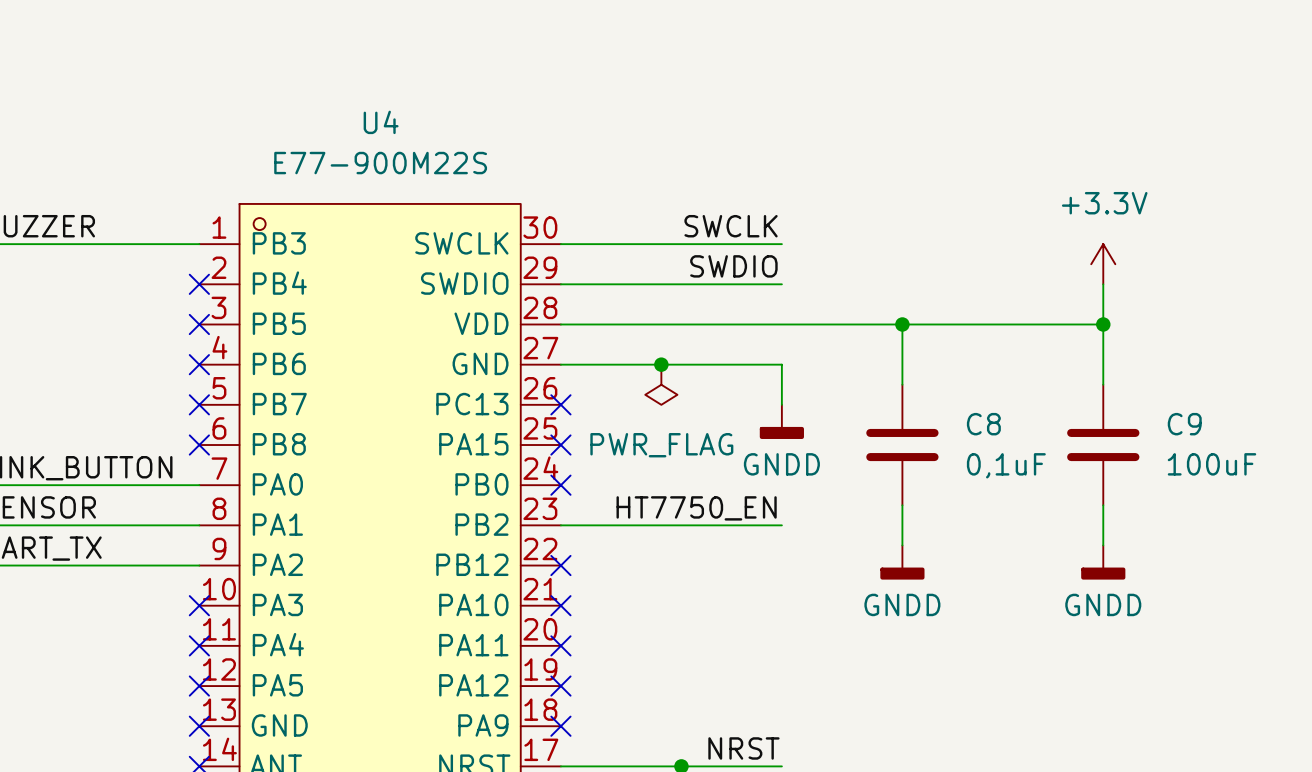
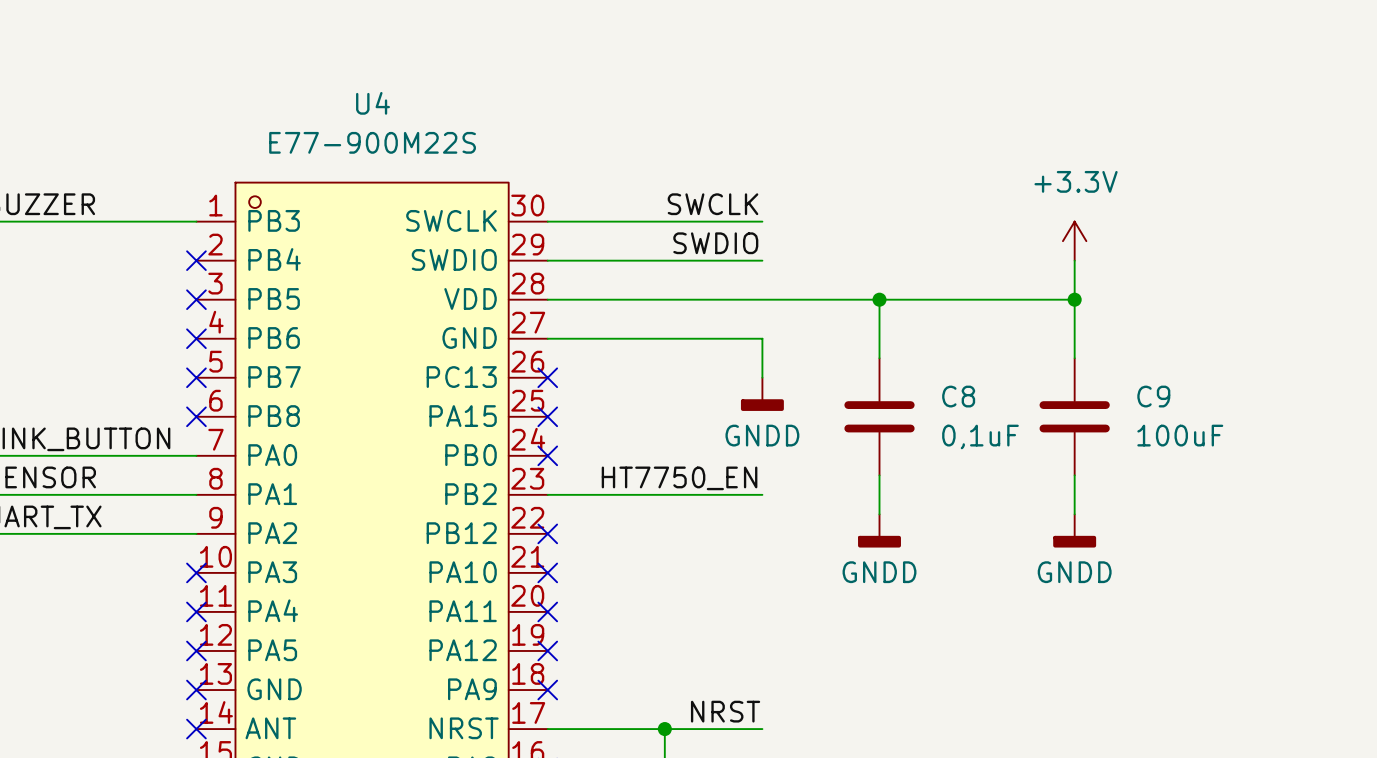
junction: (661, 364) -> none
power symbol: PWR_FLAG (661, 384) -> none

